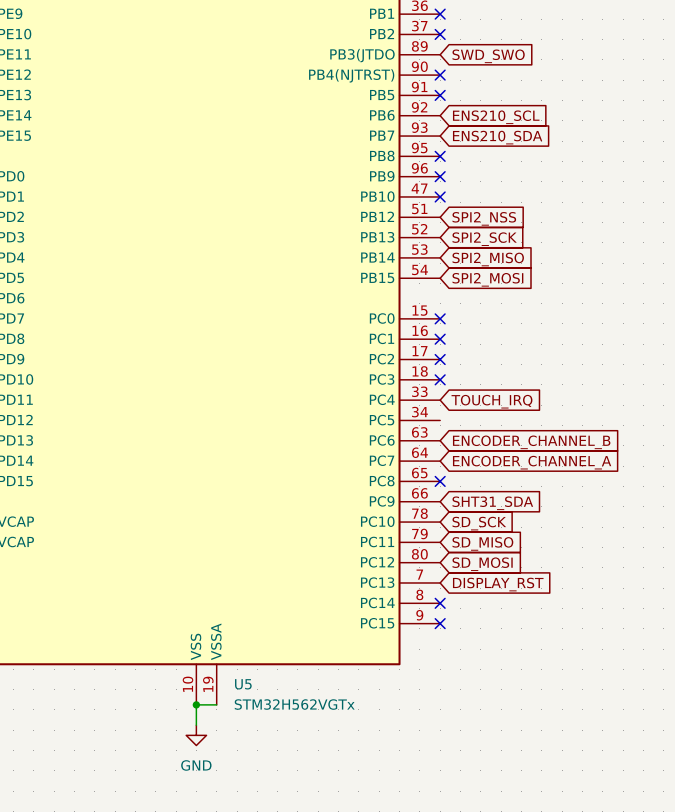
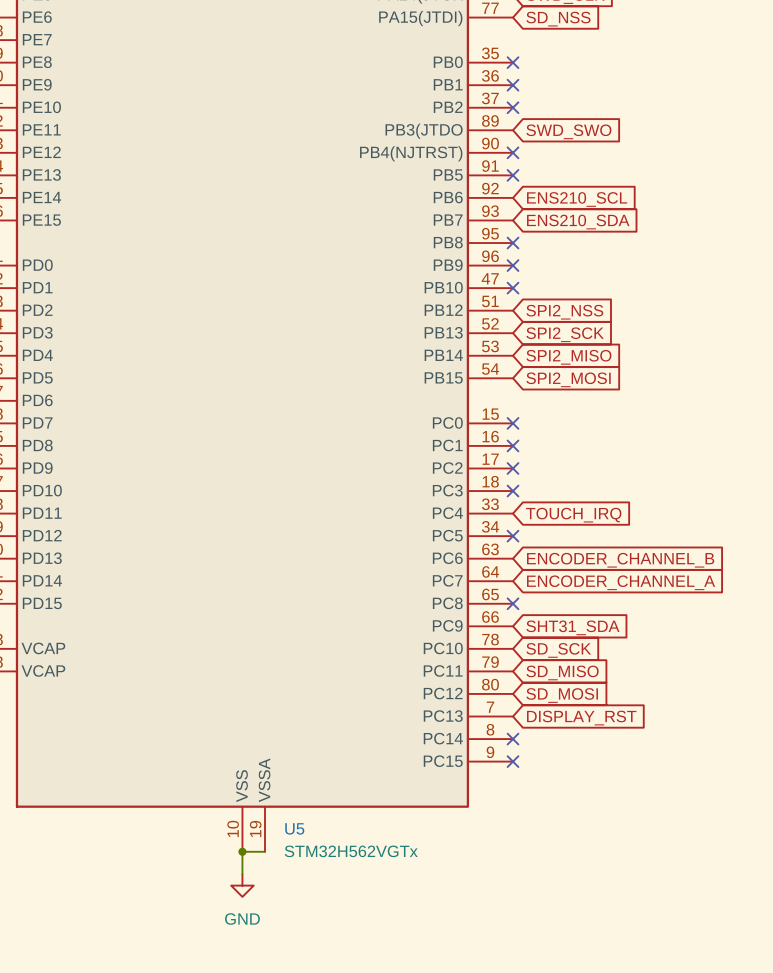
no-connect mark: none -> (513, 536)

